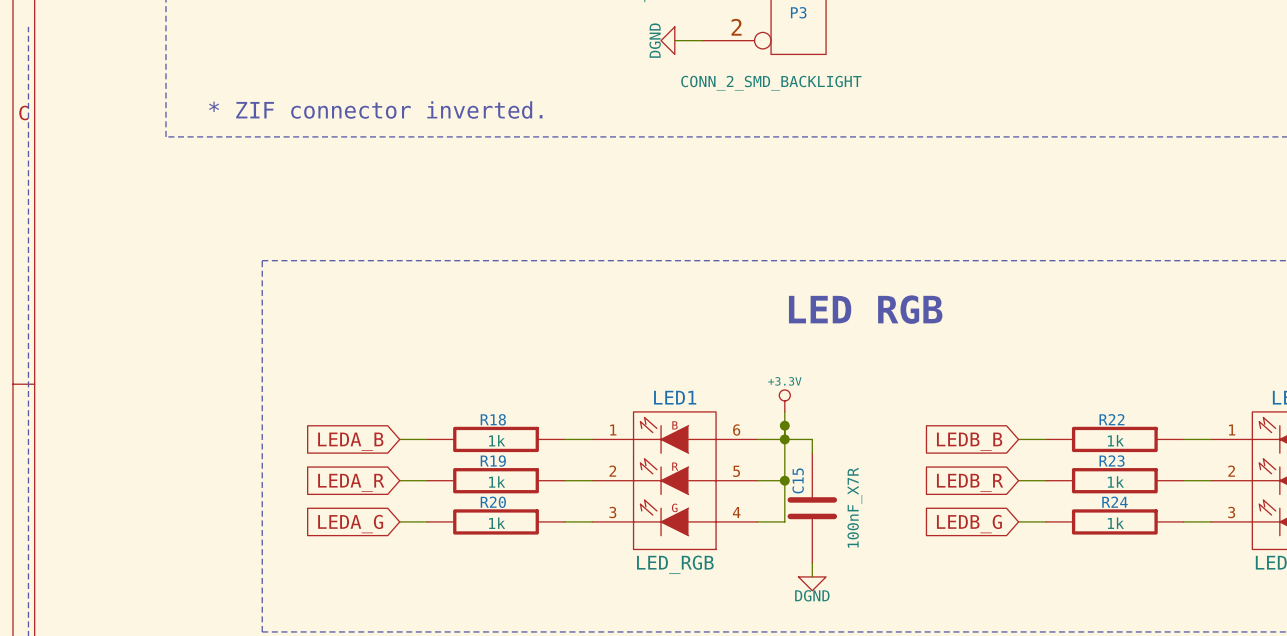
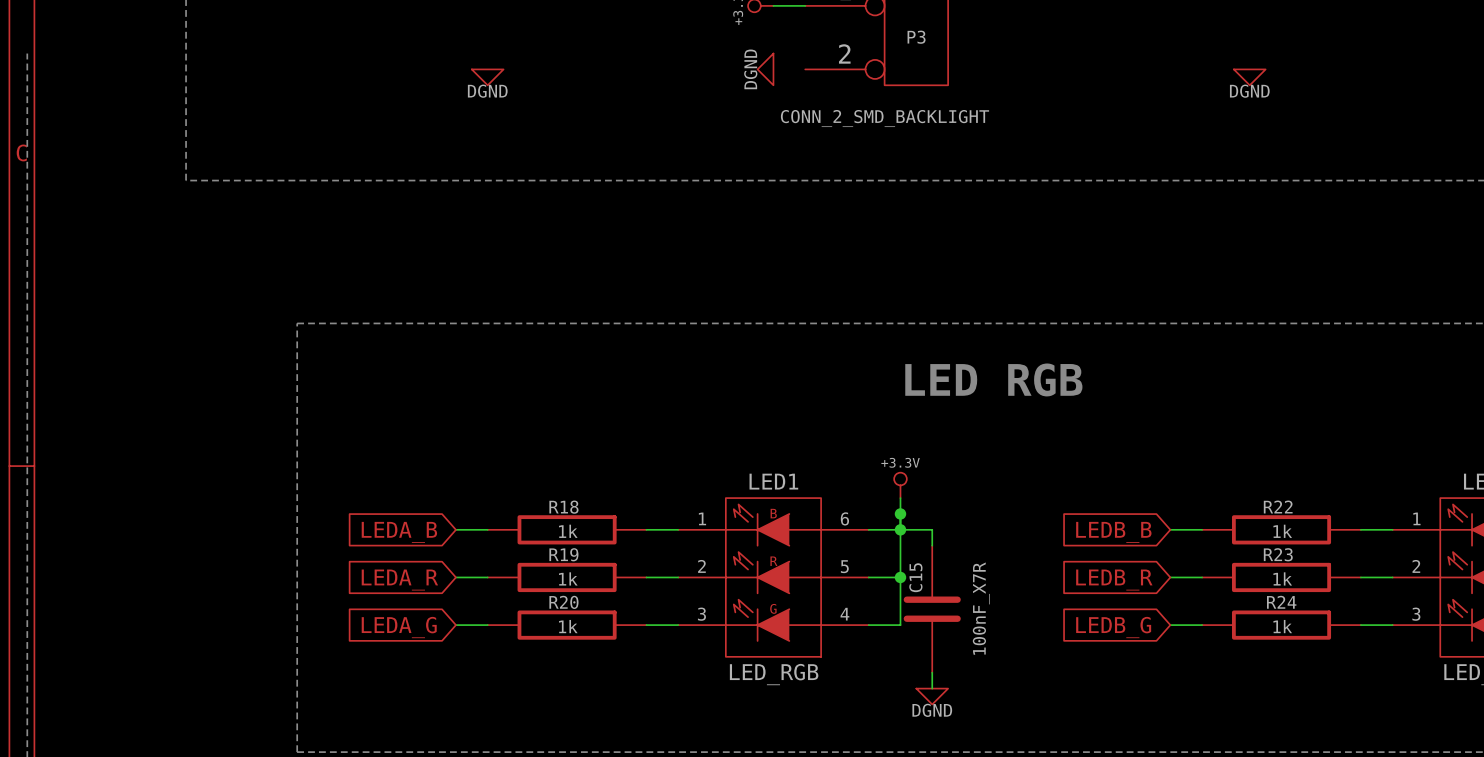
wire: (674, 40) (702, 40) -> none
power symbol: none -> DGND (487, 77)
power symbol: none -> DGND (1249, 77)
text: * ZIF connector inverted. (375, 110) -> none

